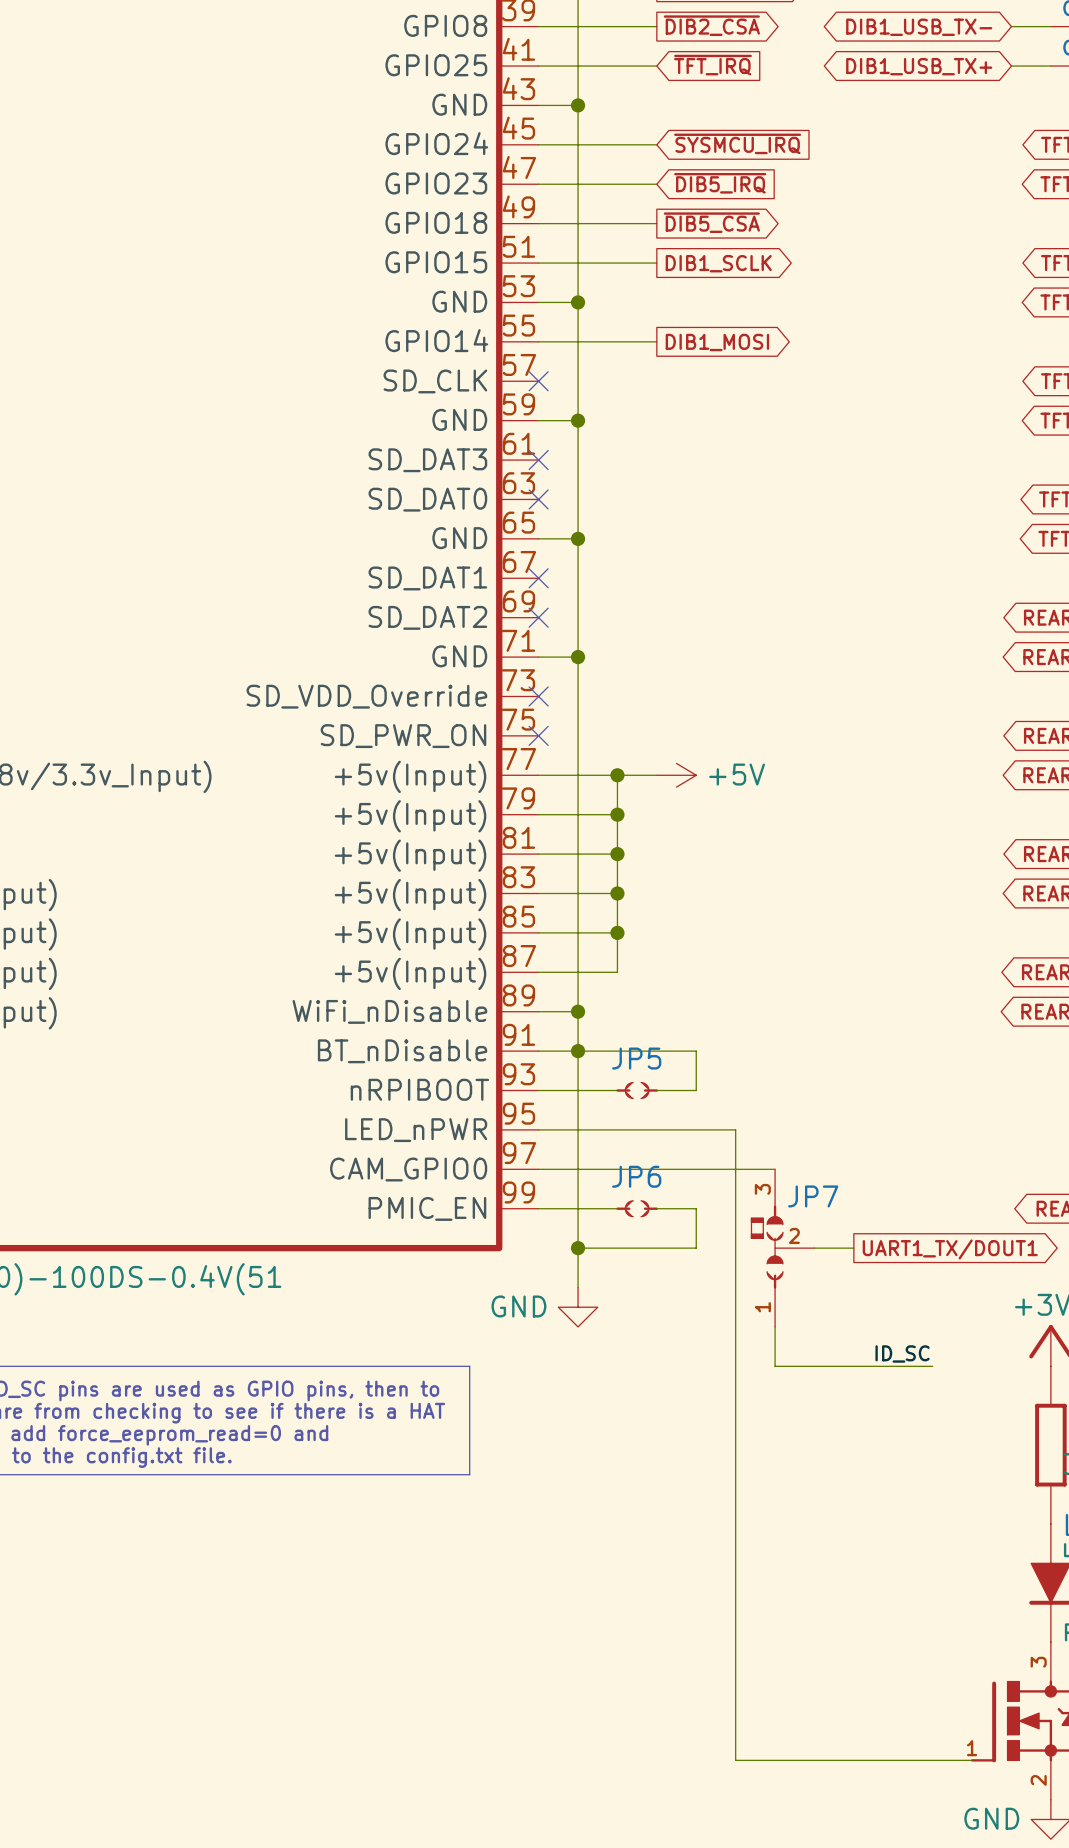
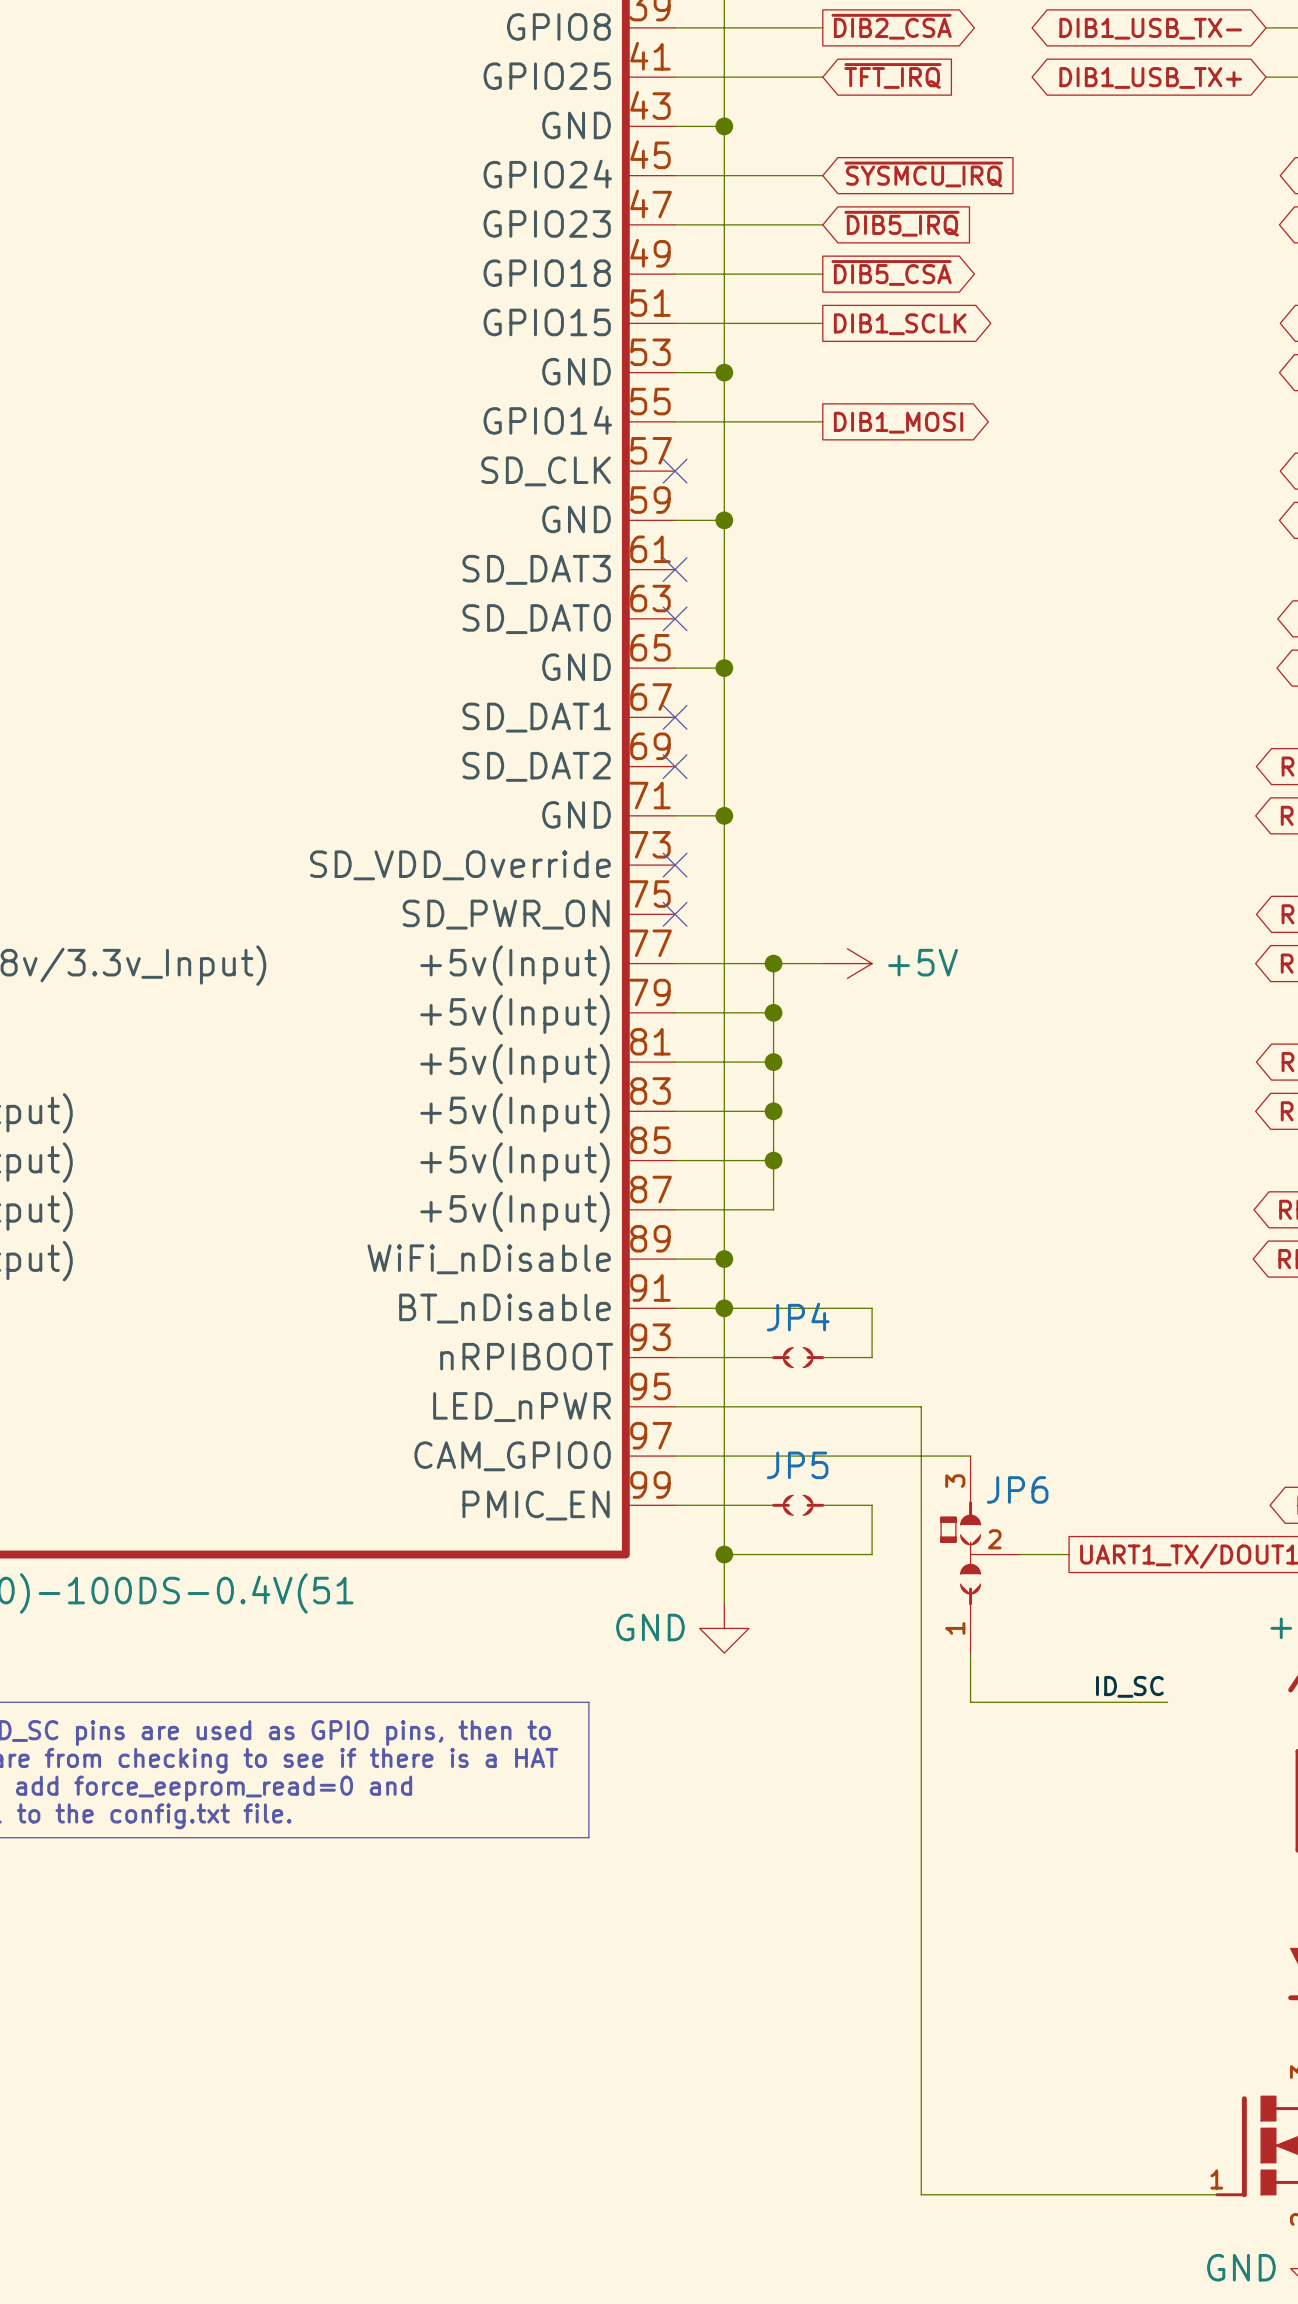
JP5 name: JP5 (636, 1058) -> JP4 (798, 1317)
JP6 name: JP6 (636, 1176) -> JP5 (797, 1465)
JP7 name: JP7 (813, 1196) -> JP6 (1017, 1489)

